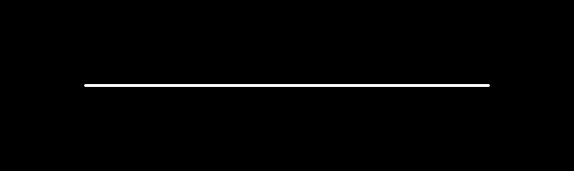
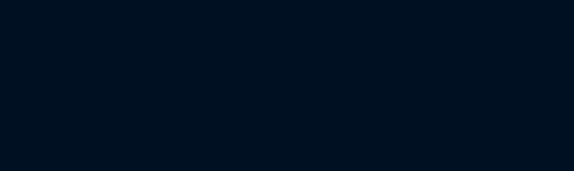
board edge: (488, 85) (85, 85) -> none

